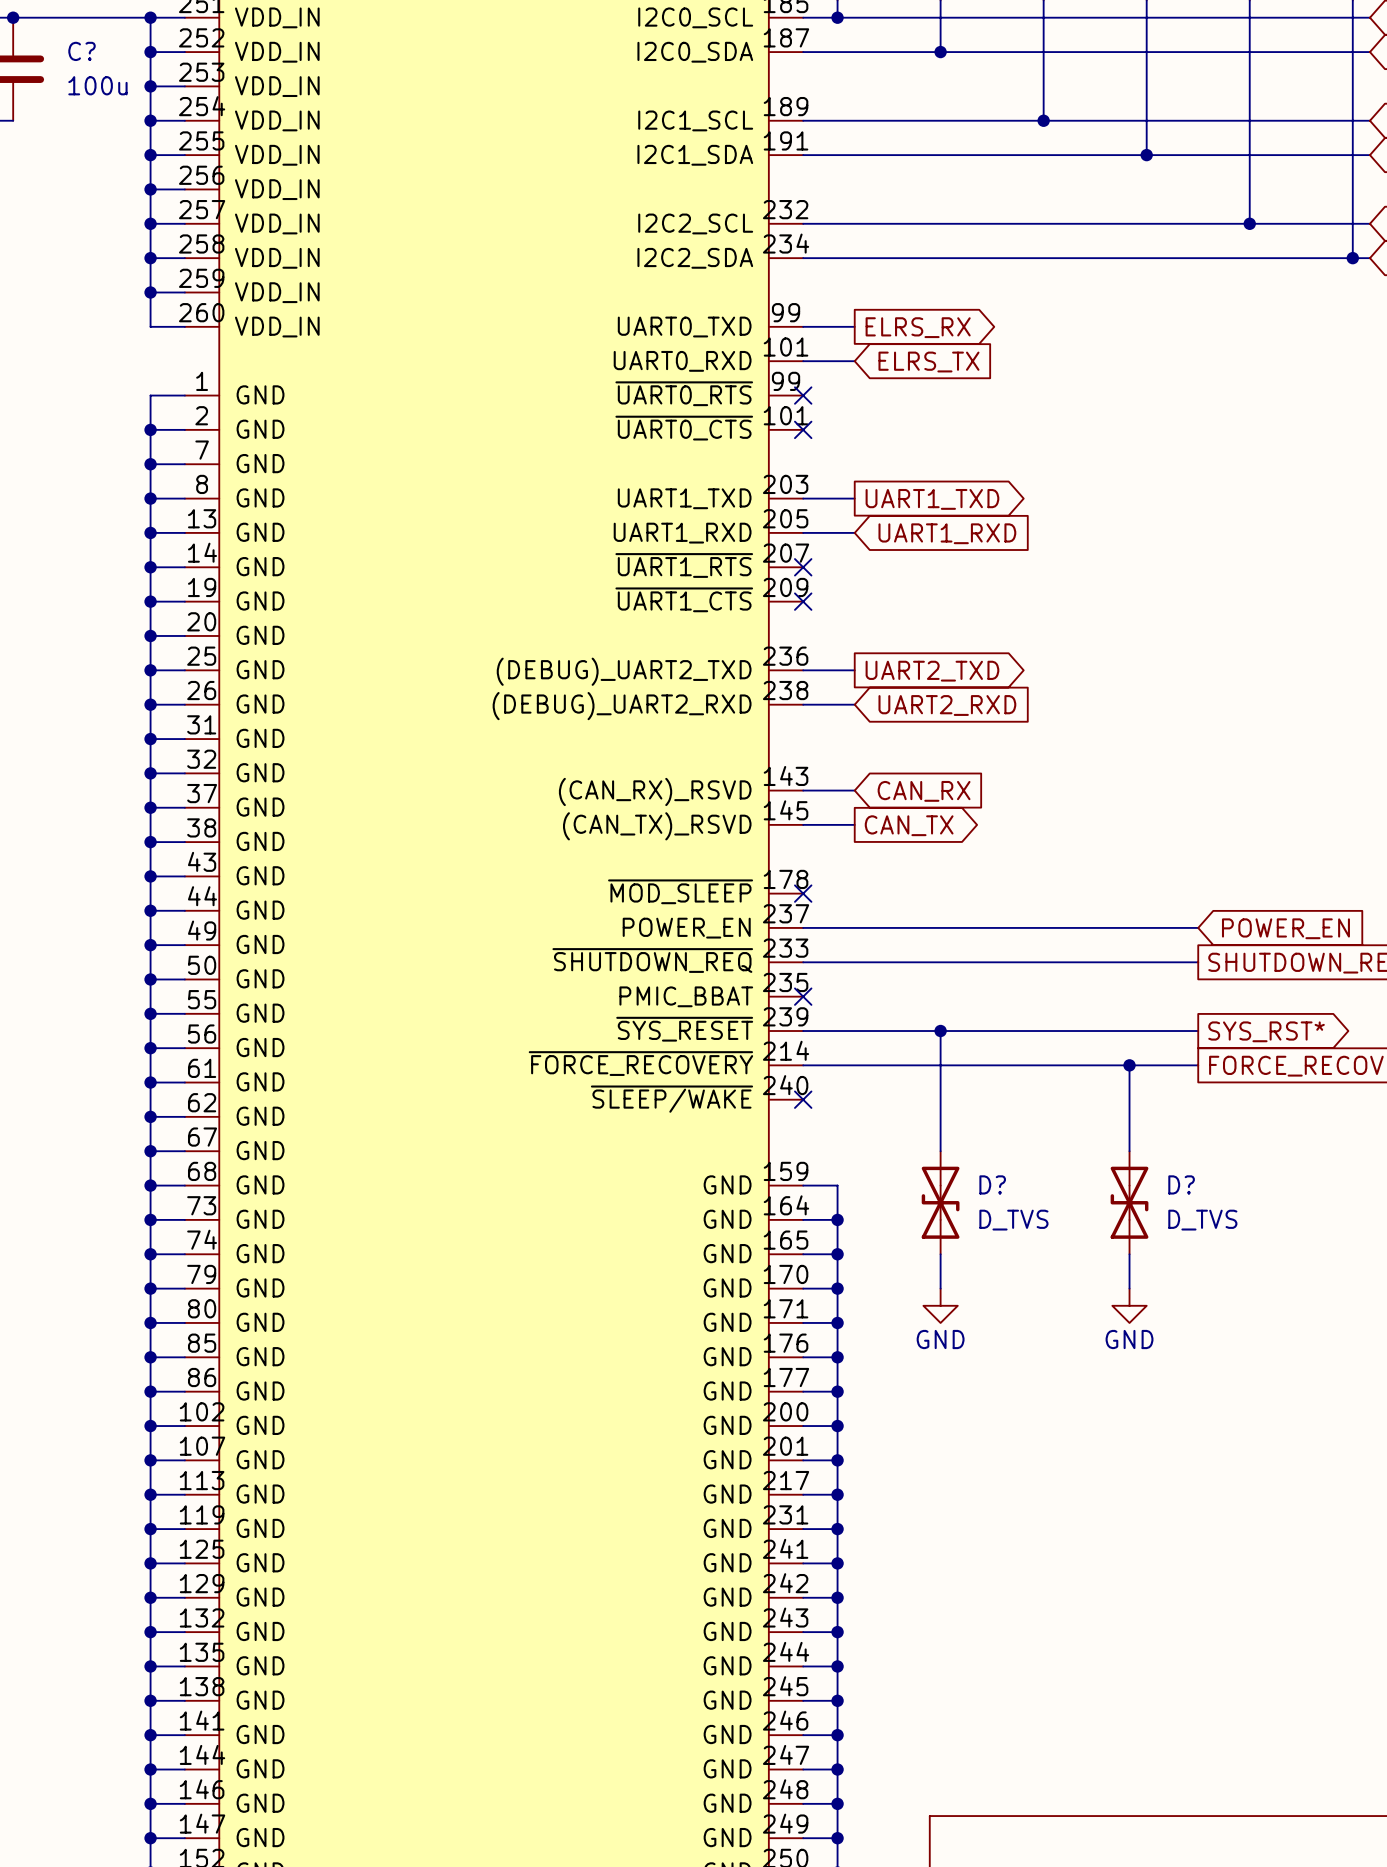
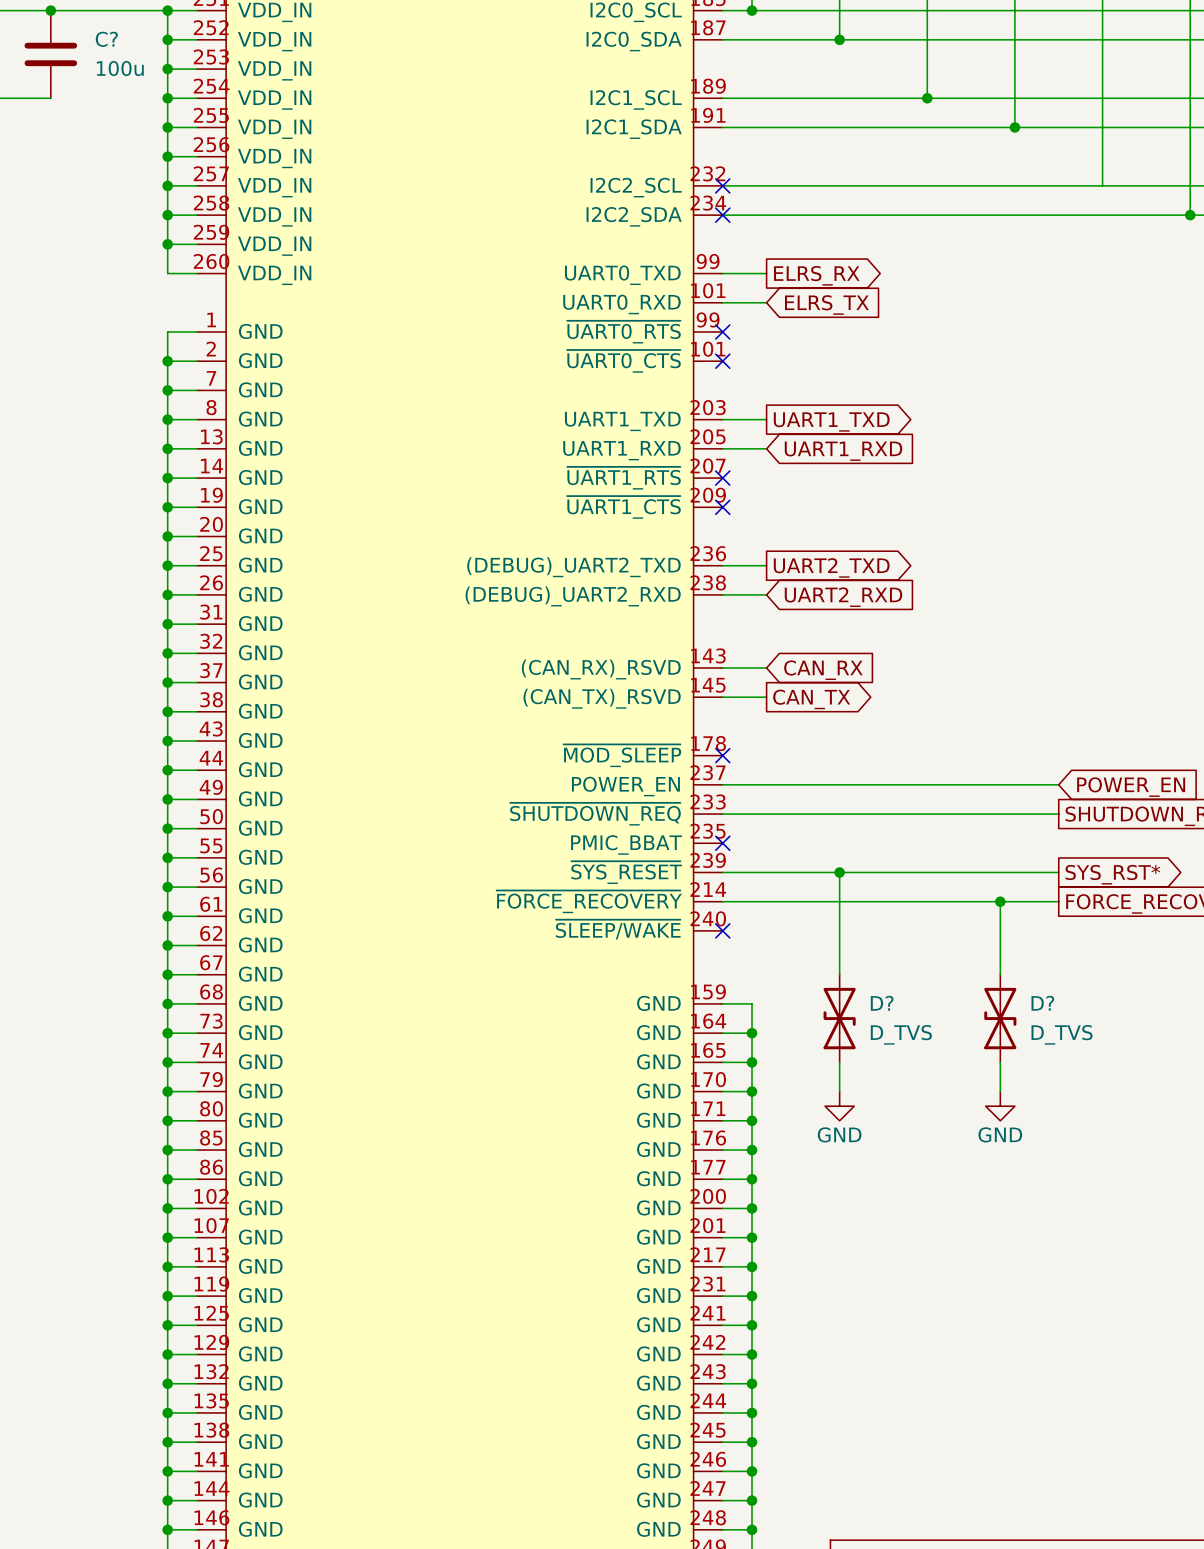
no-connect mark: none -> (722, 185)
junction: (1249, 223) -> none
no-connect mark: none -> (722, 215)

